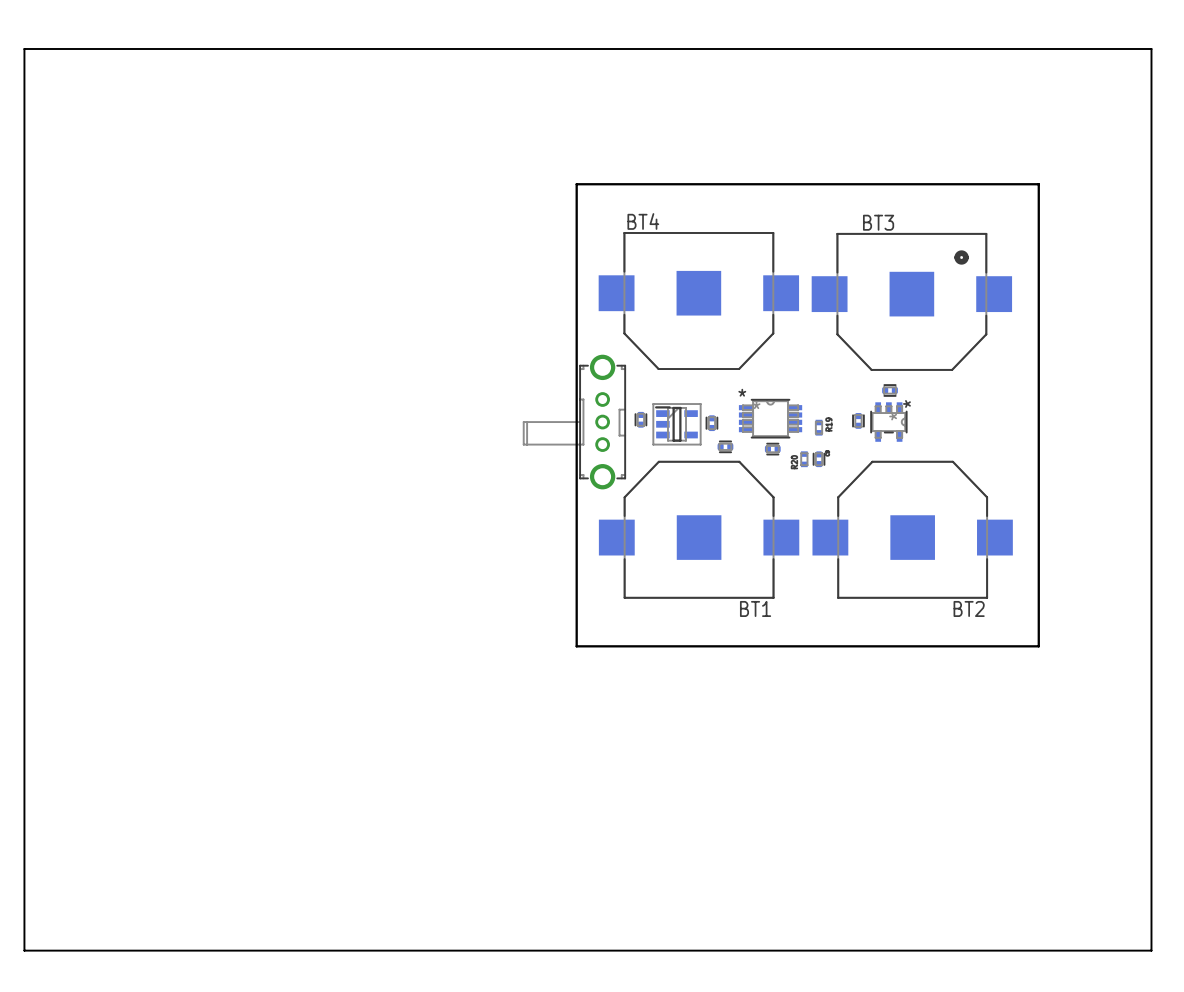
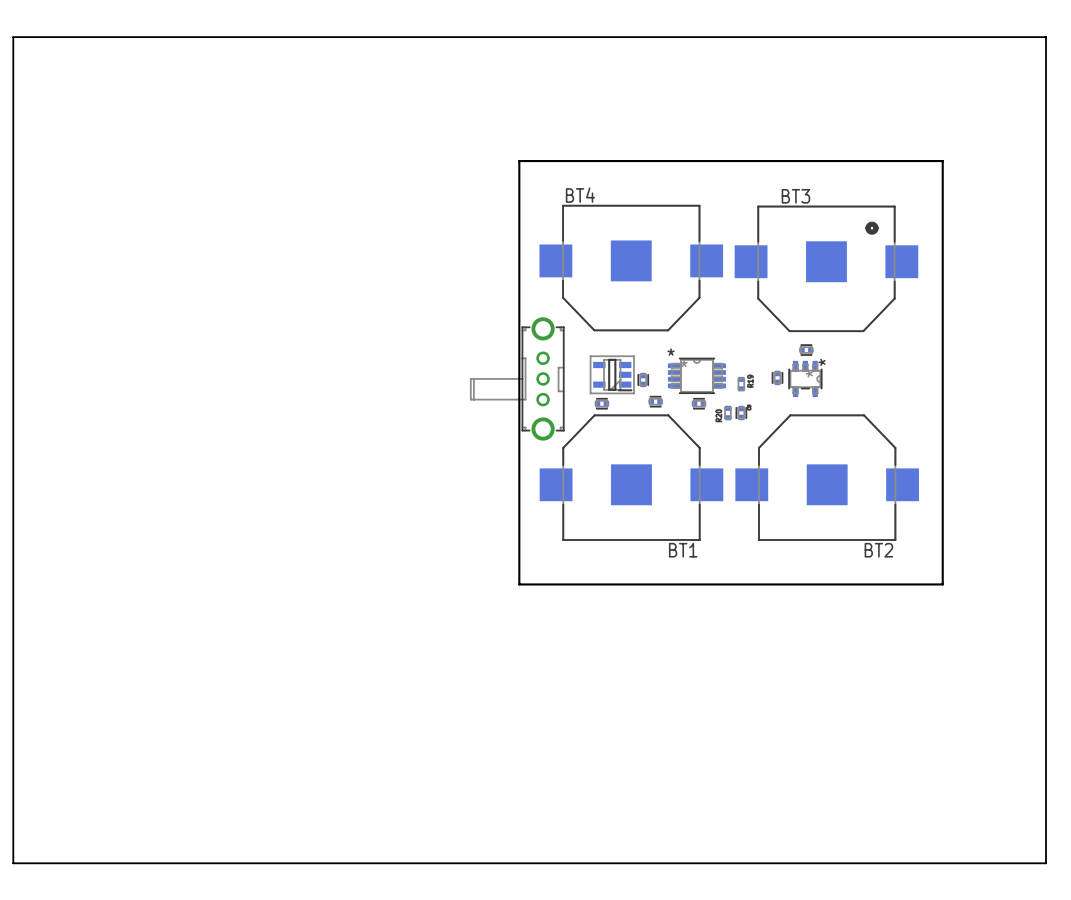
part rotation: 0° (640, 419) -> 90° clockwise (601, 403)
part position: (640, 419) -> (601, 403)
part rotation: 0° (677, 424) -> 180° (612, 374)

